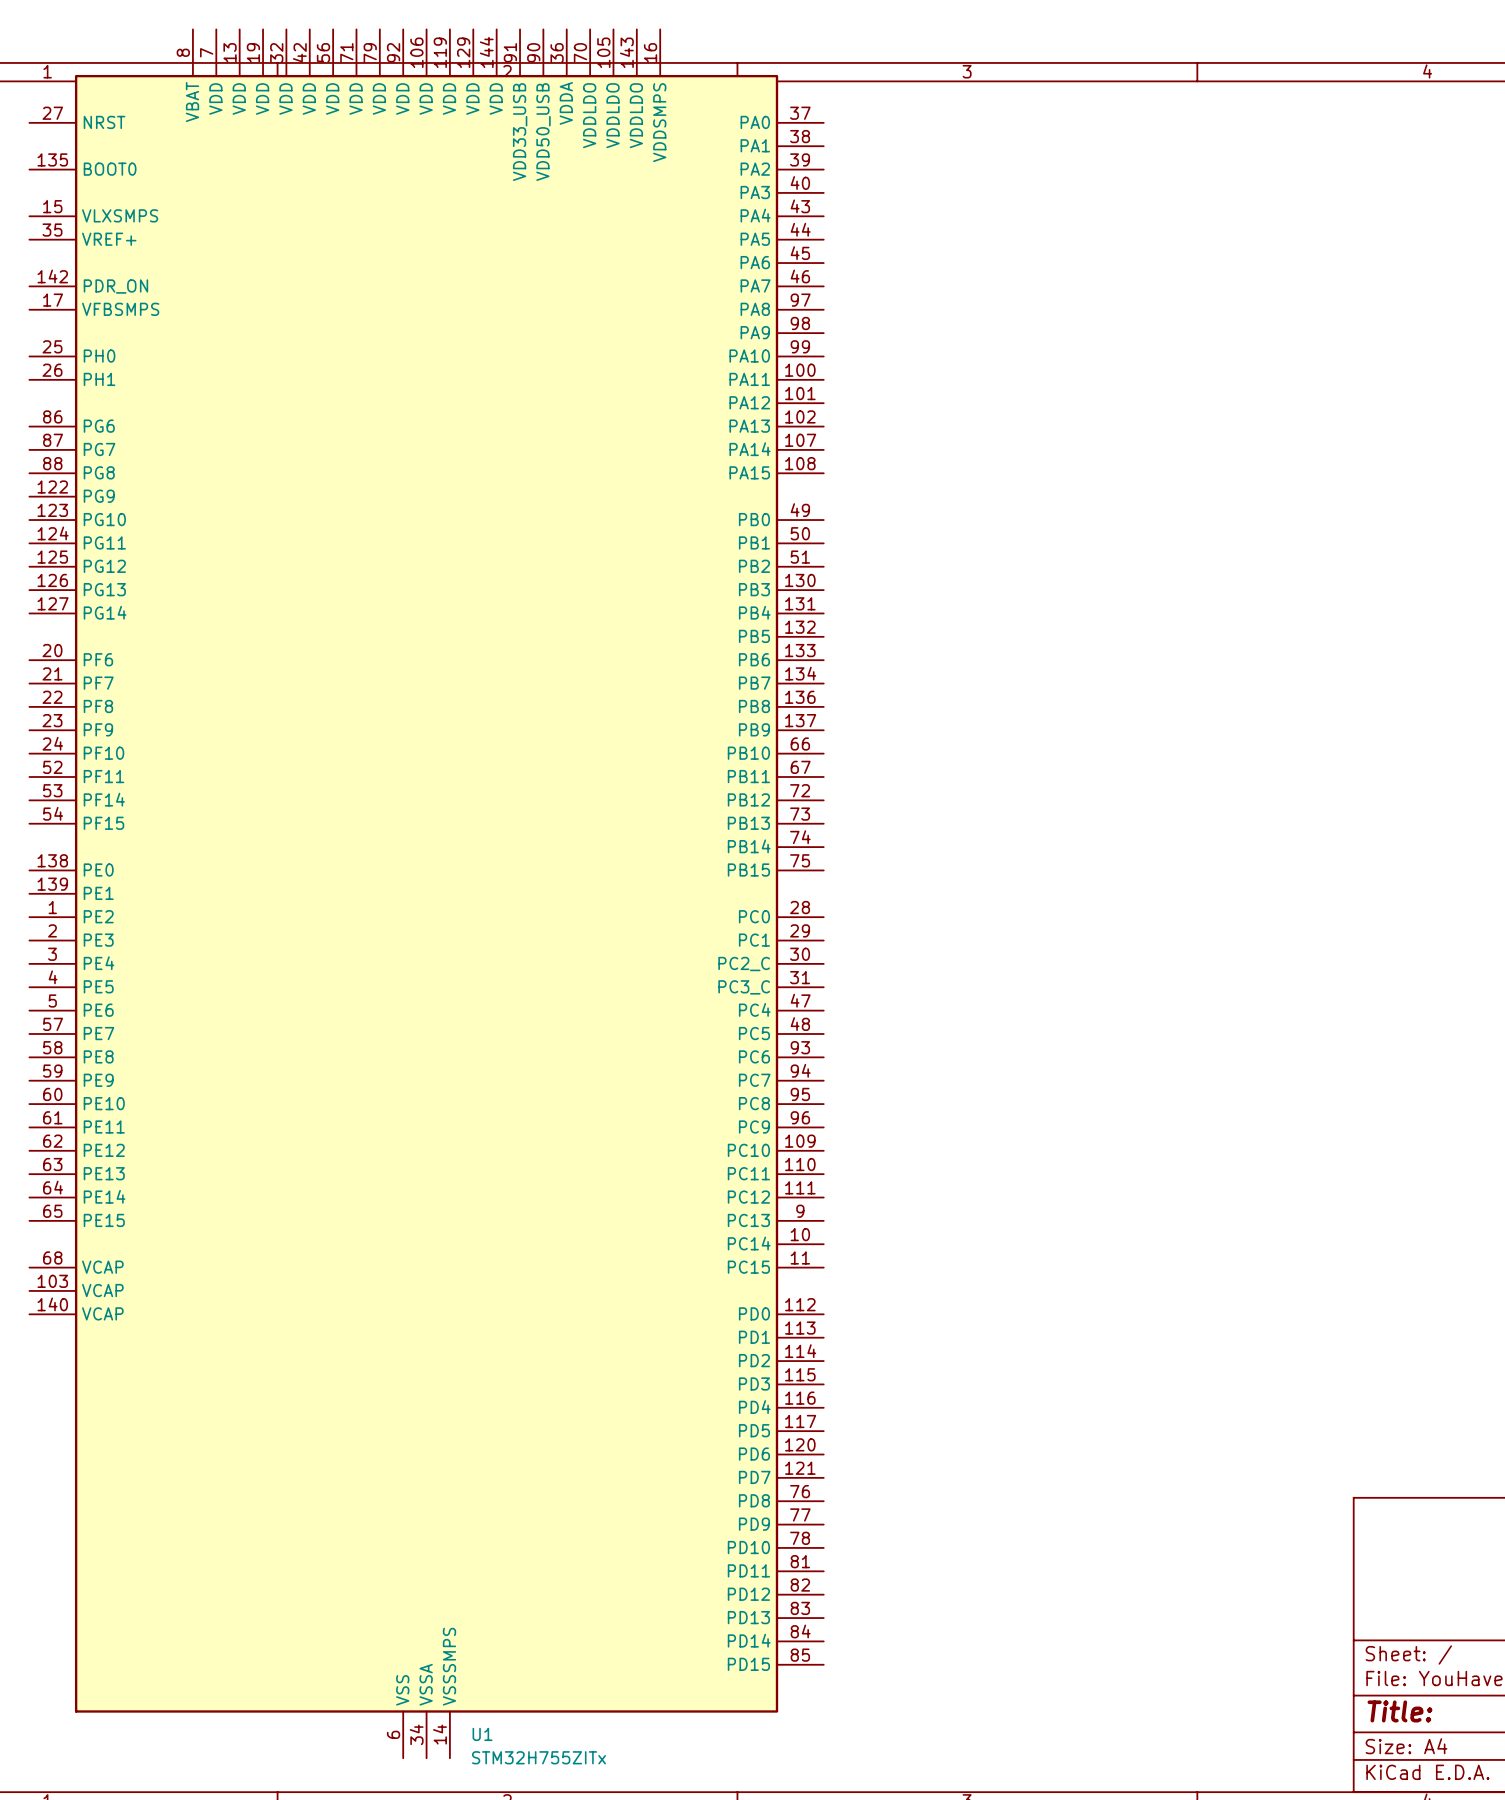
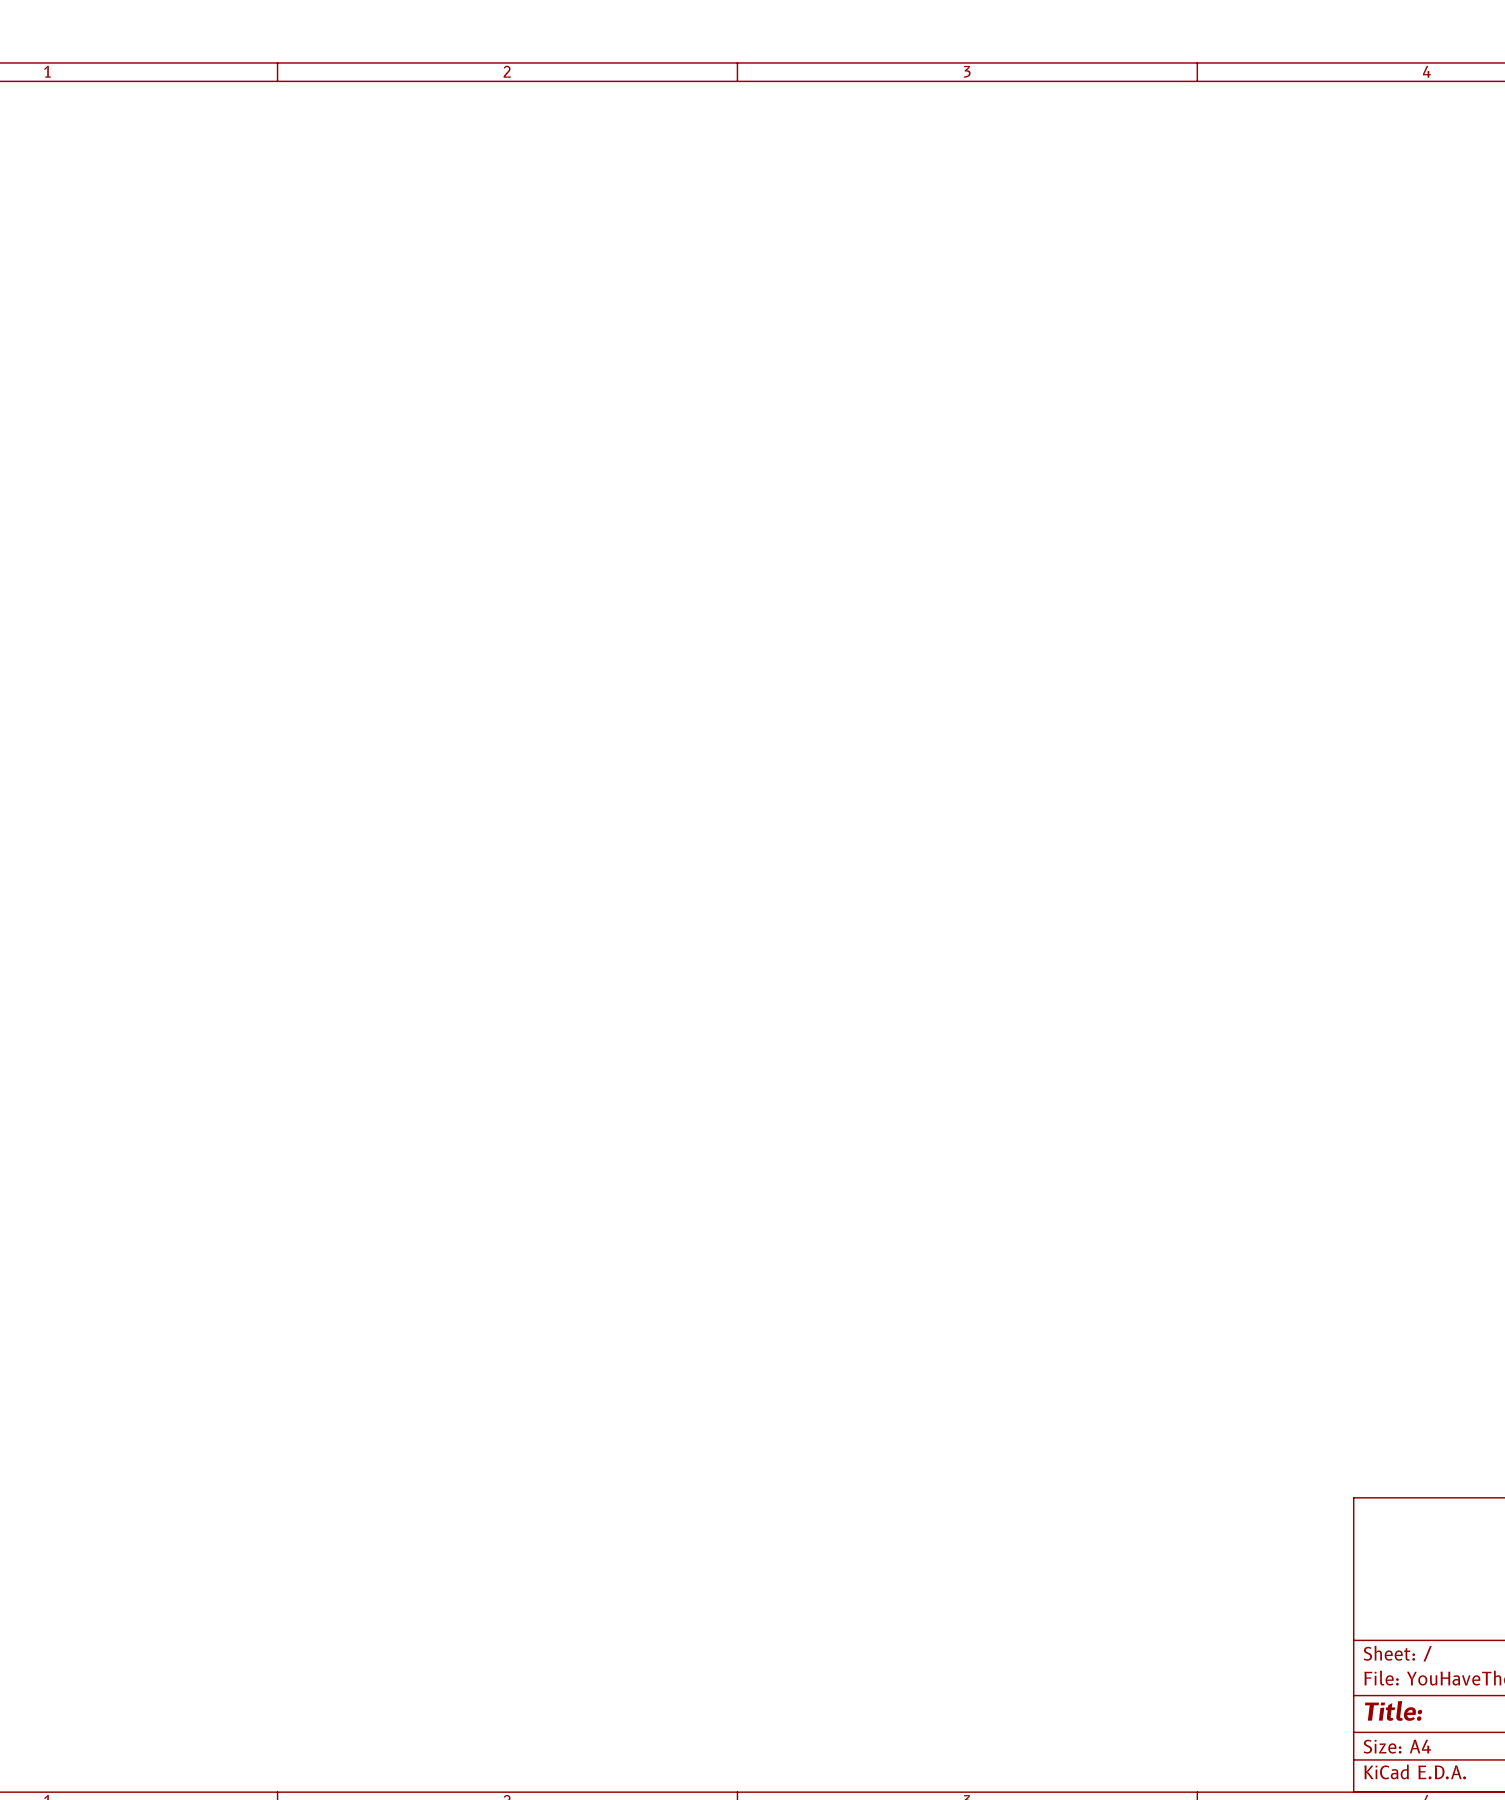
U1: STM32H755ZITx (426, 893) -> none

